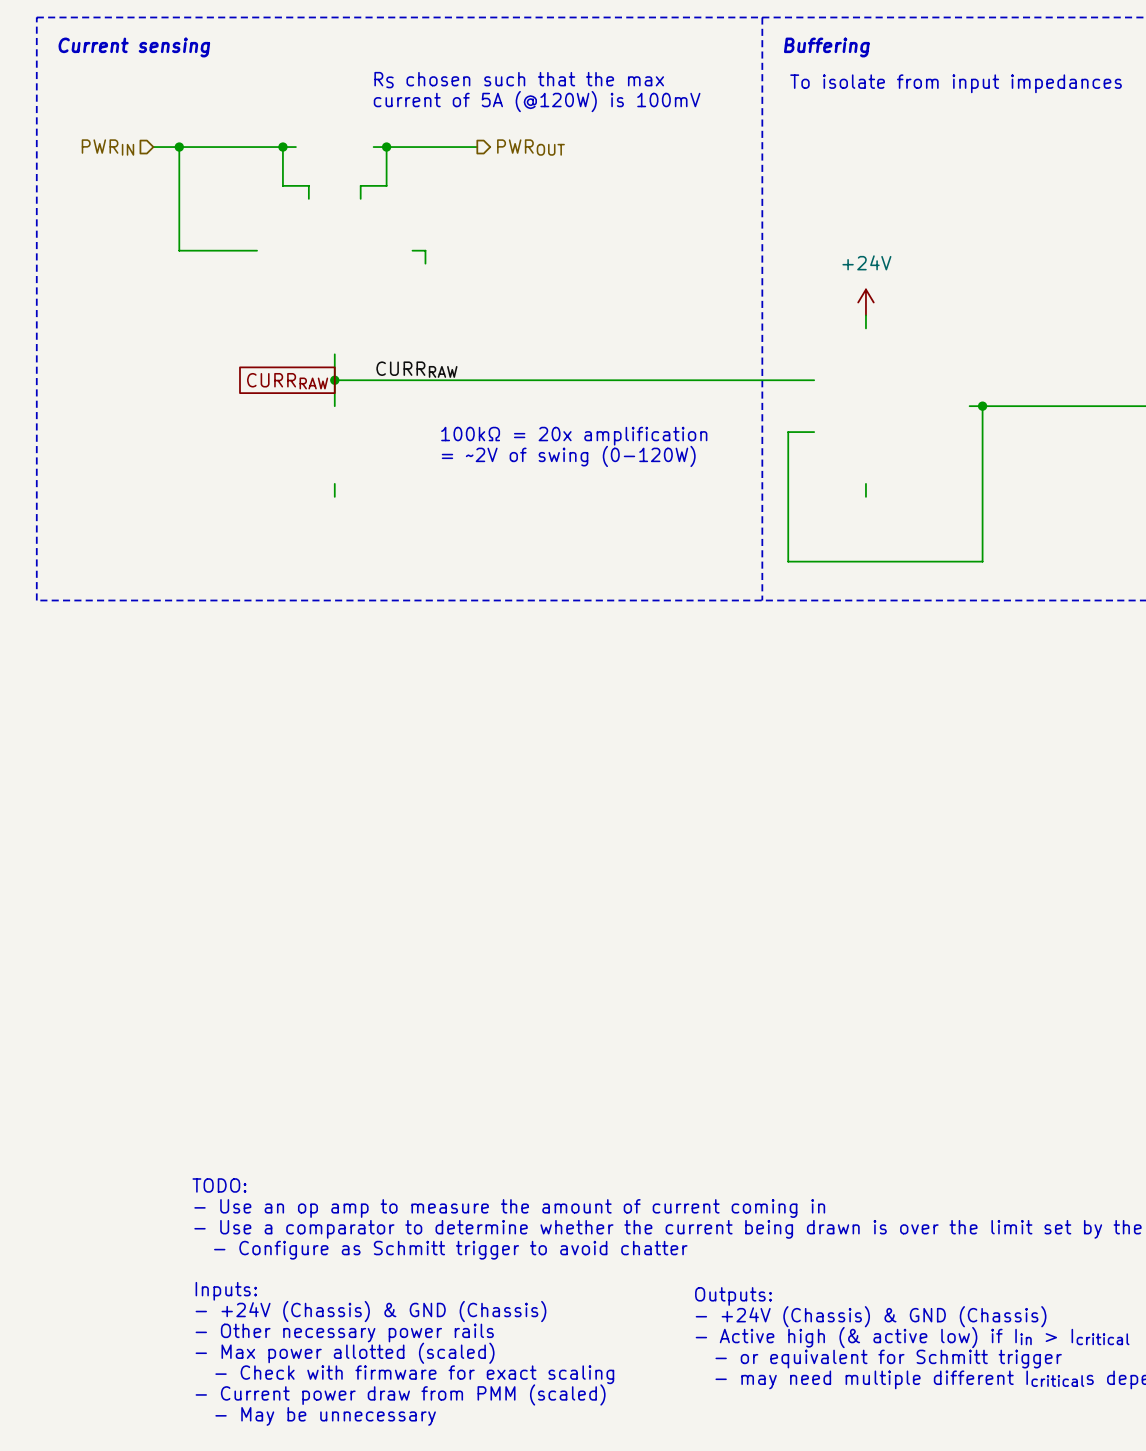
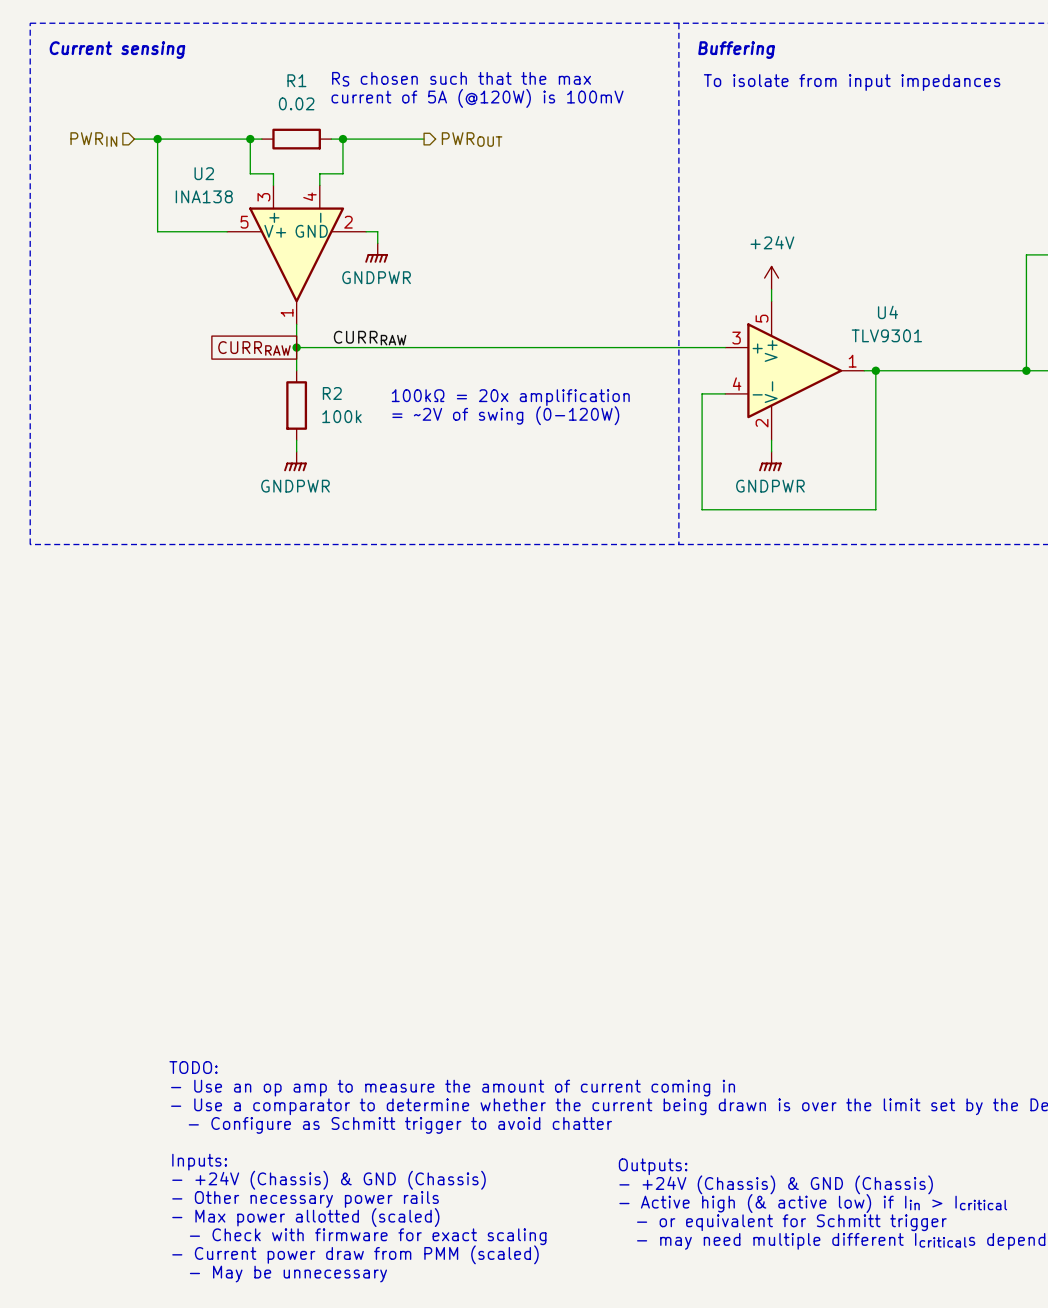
R1: none -> 0.02 (296, 139)
power symbol: none -> GNDPWR (376, 253)
U2: none -> INA138 (296, 254)
U4: none -> TLV9301 (794, 370)
R2: none -> 100k (296, 405)
power symbol: none -> GNDPWR (295, 461)
power symbol: none -> GNDPWR (770, 461)

